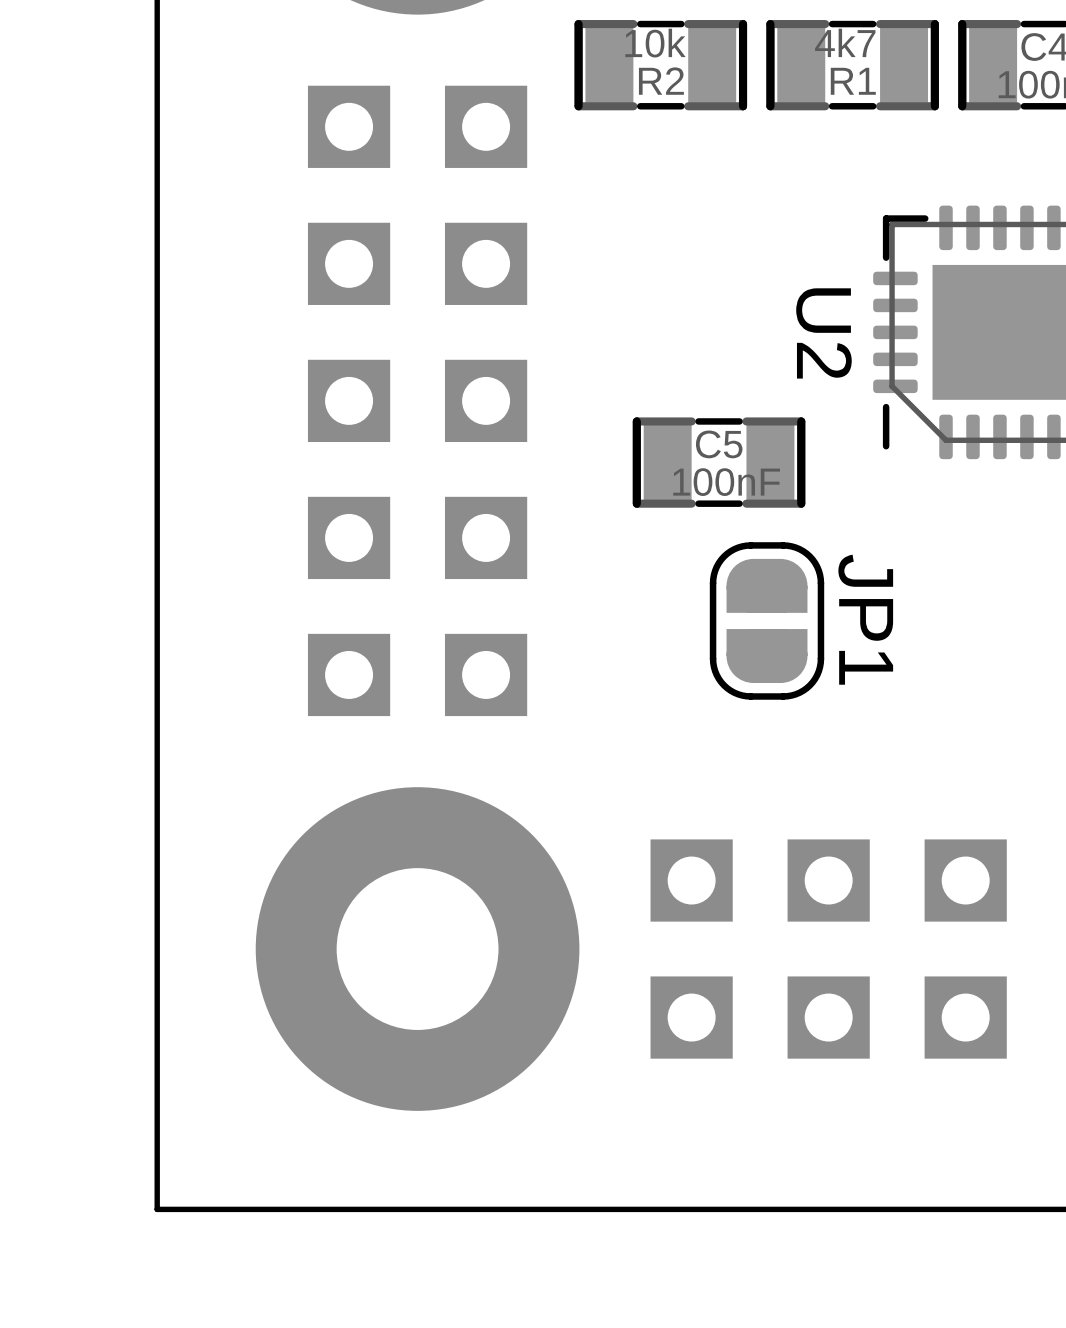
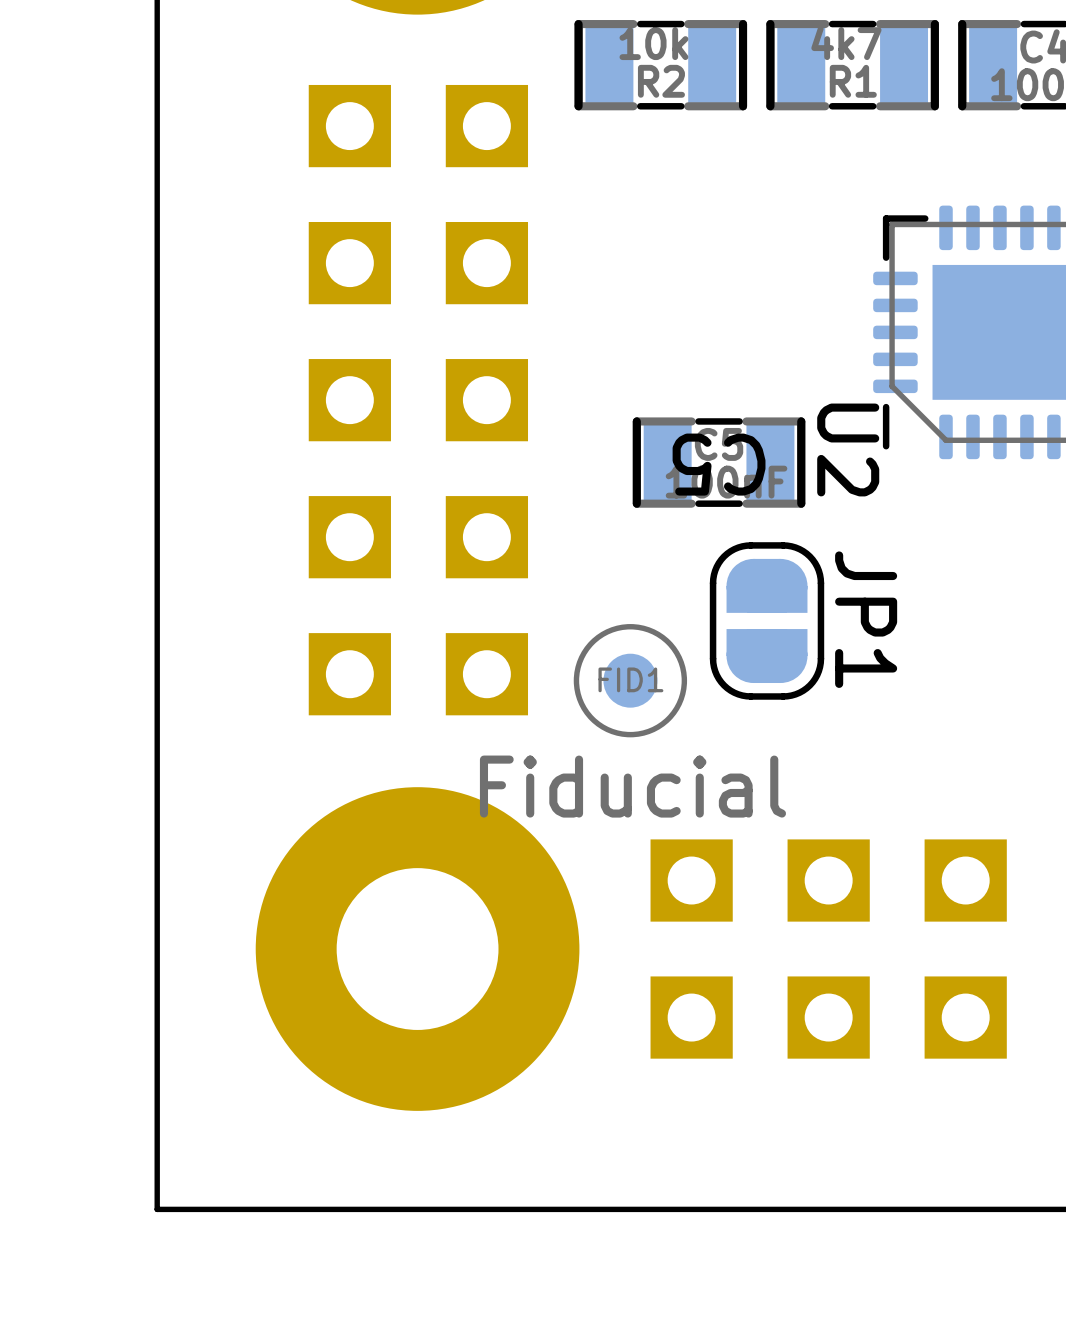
part: (417, 126) -> none
part: (417, 263) -> none
U2 name position: U2 (823, 333) -> U2 (848, 449)
part footprint: [307, 359, 528, 443] -> [308, 84, 529, 716]
C5 text: none -> C5 (719, 464)
part: (417, 537) -> none
part: (417, 674) -> none
FID1: none -> Fiducial (630, 680)

